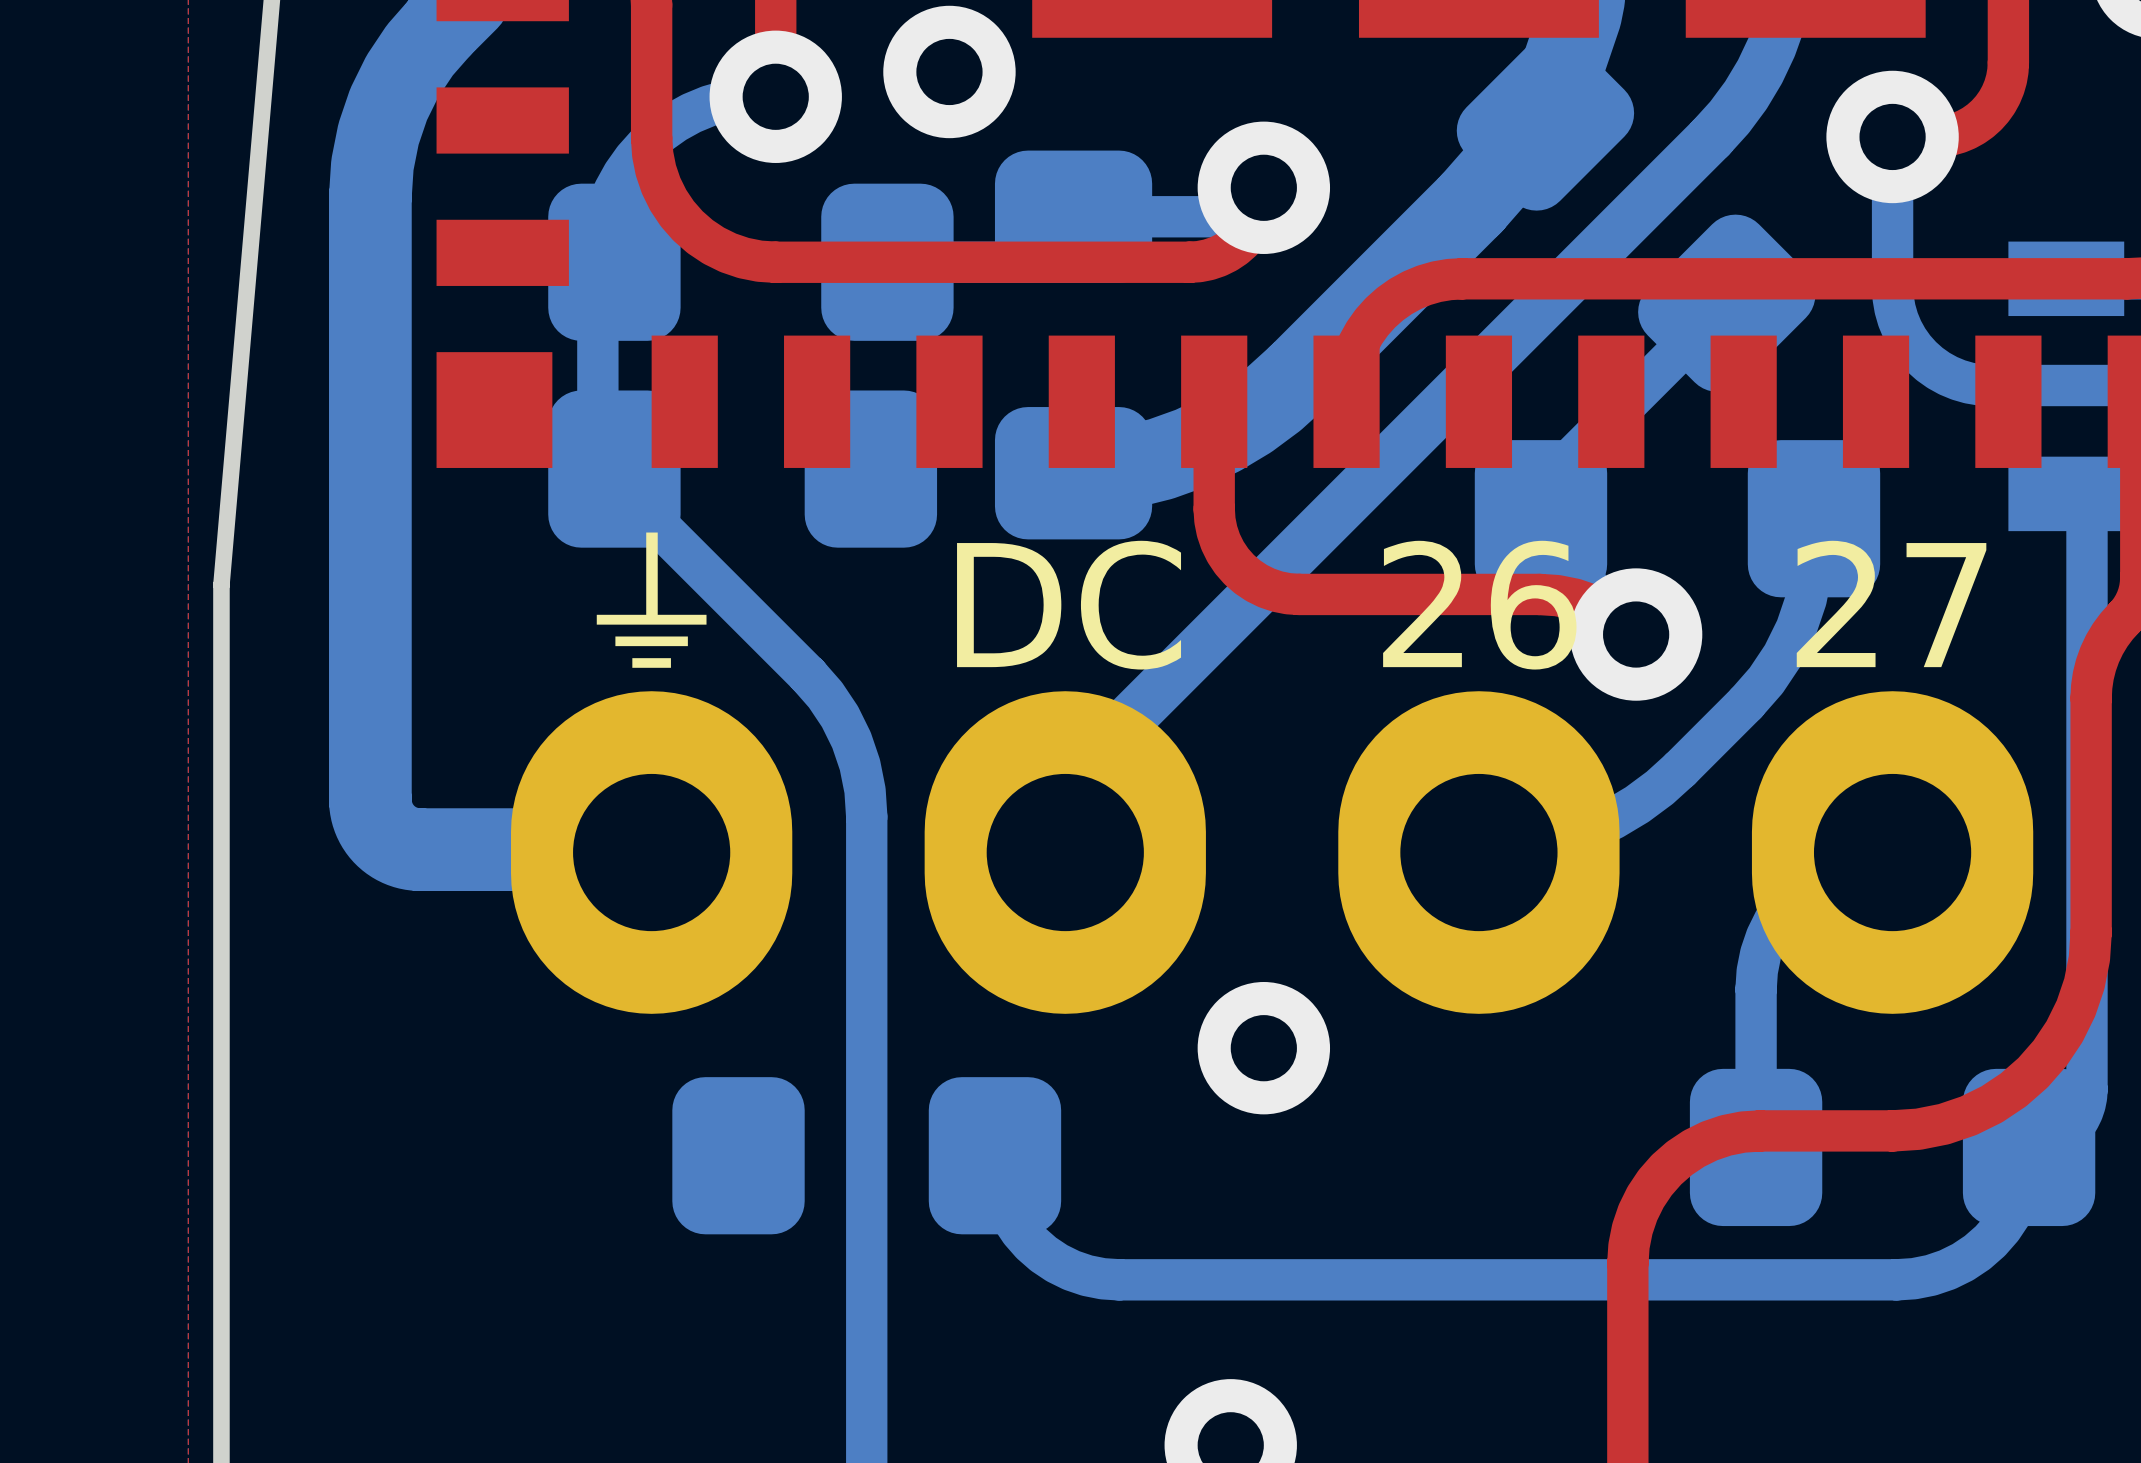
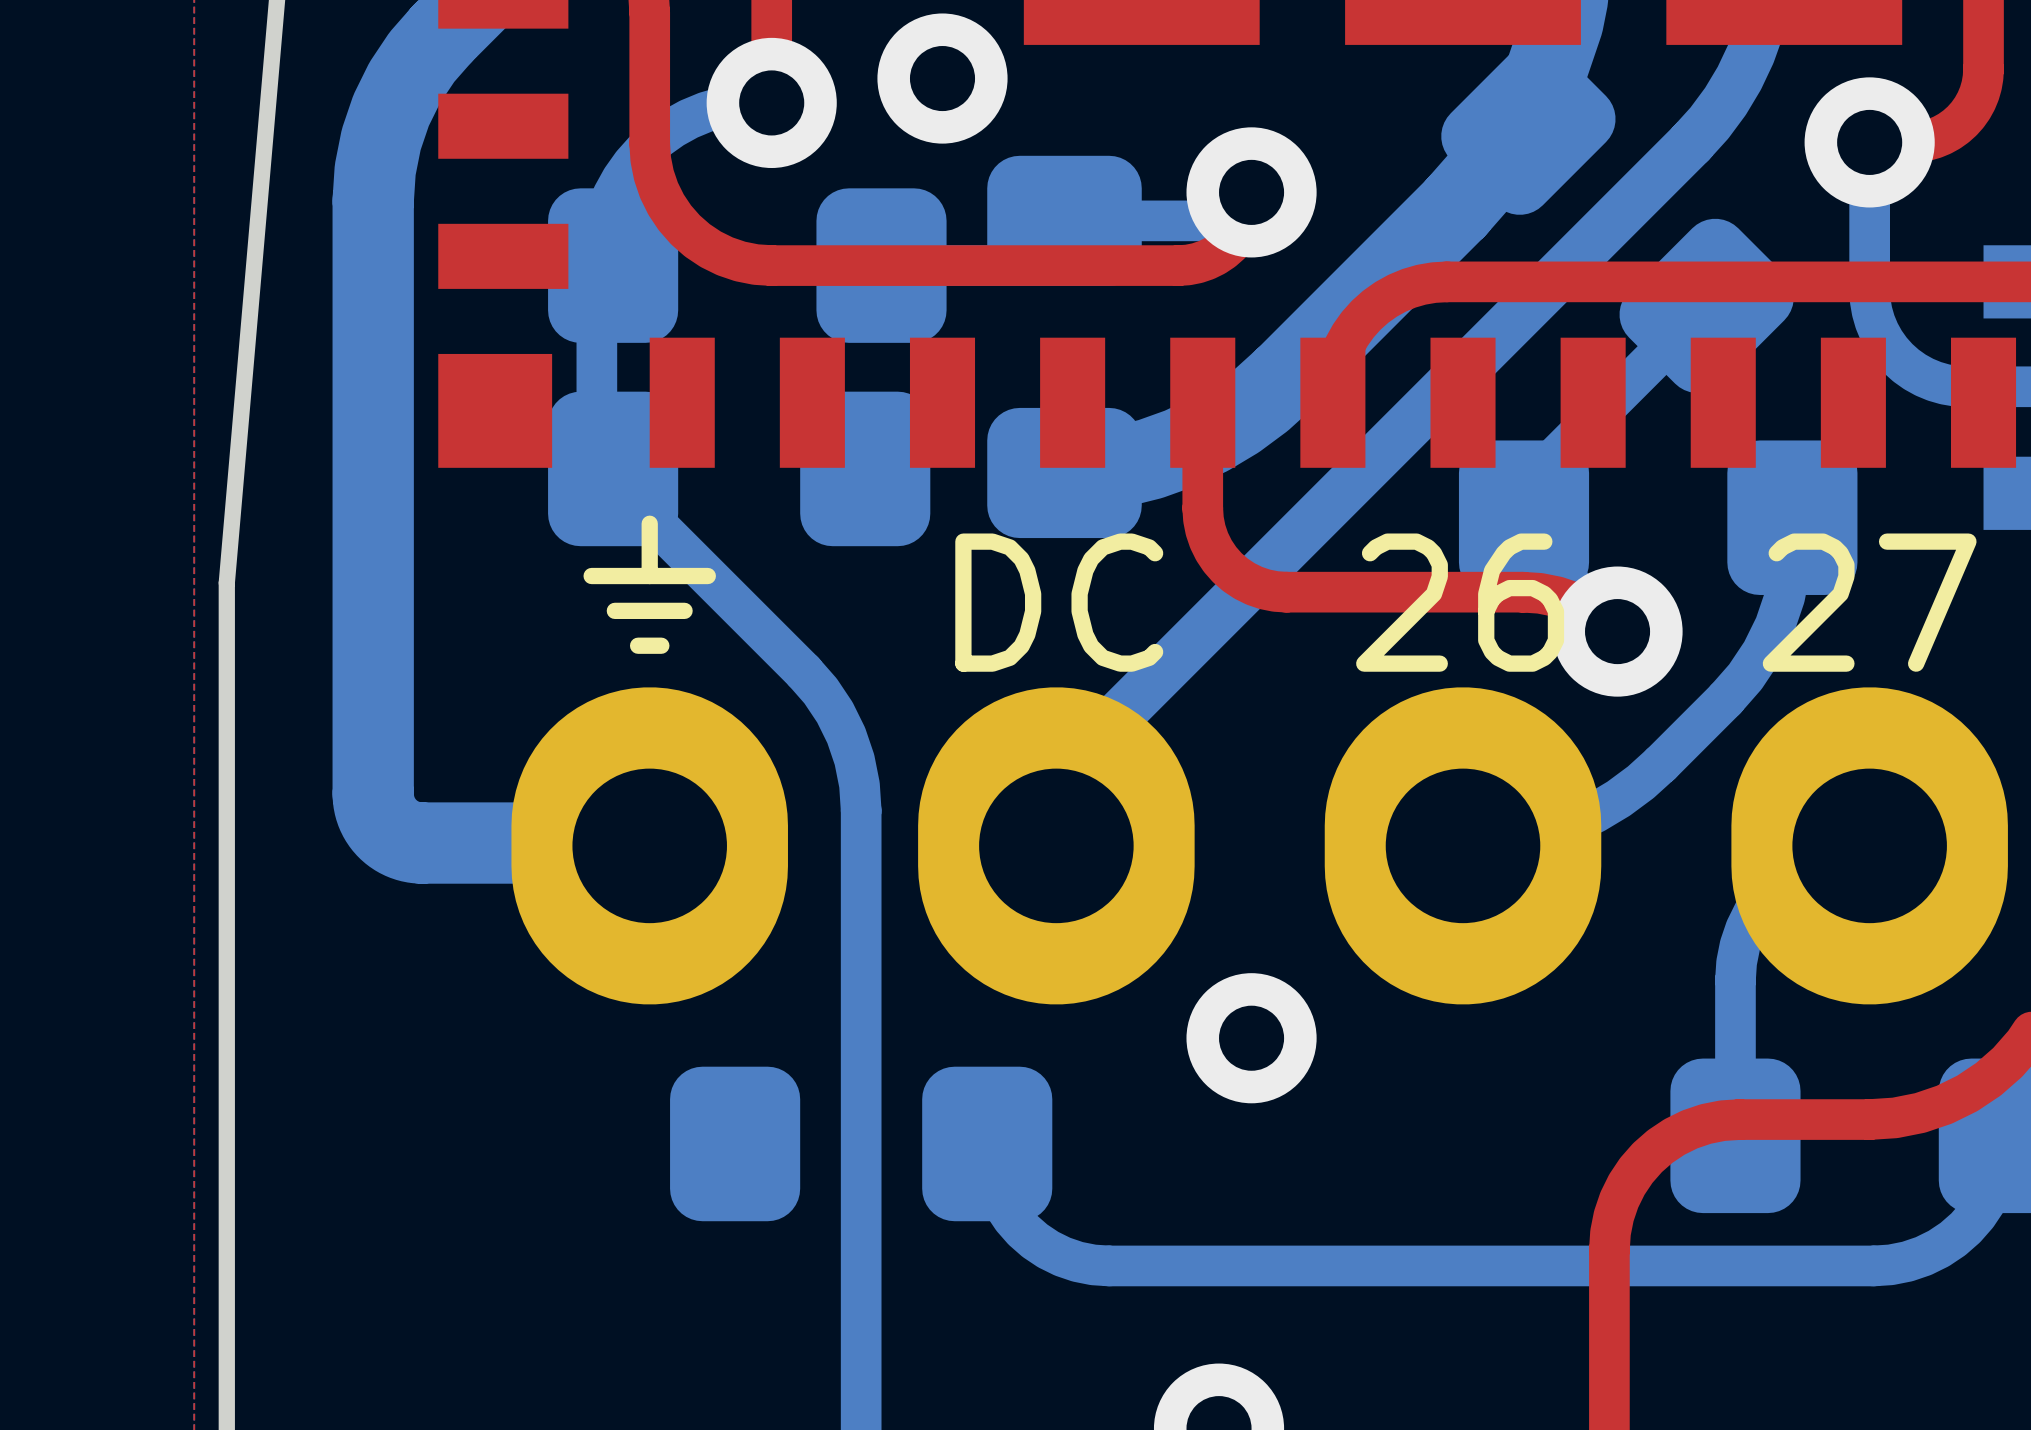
text position: ⏚ (651, 600) -> ⏚ (649, 584)

